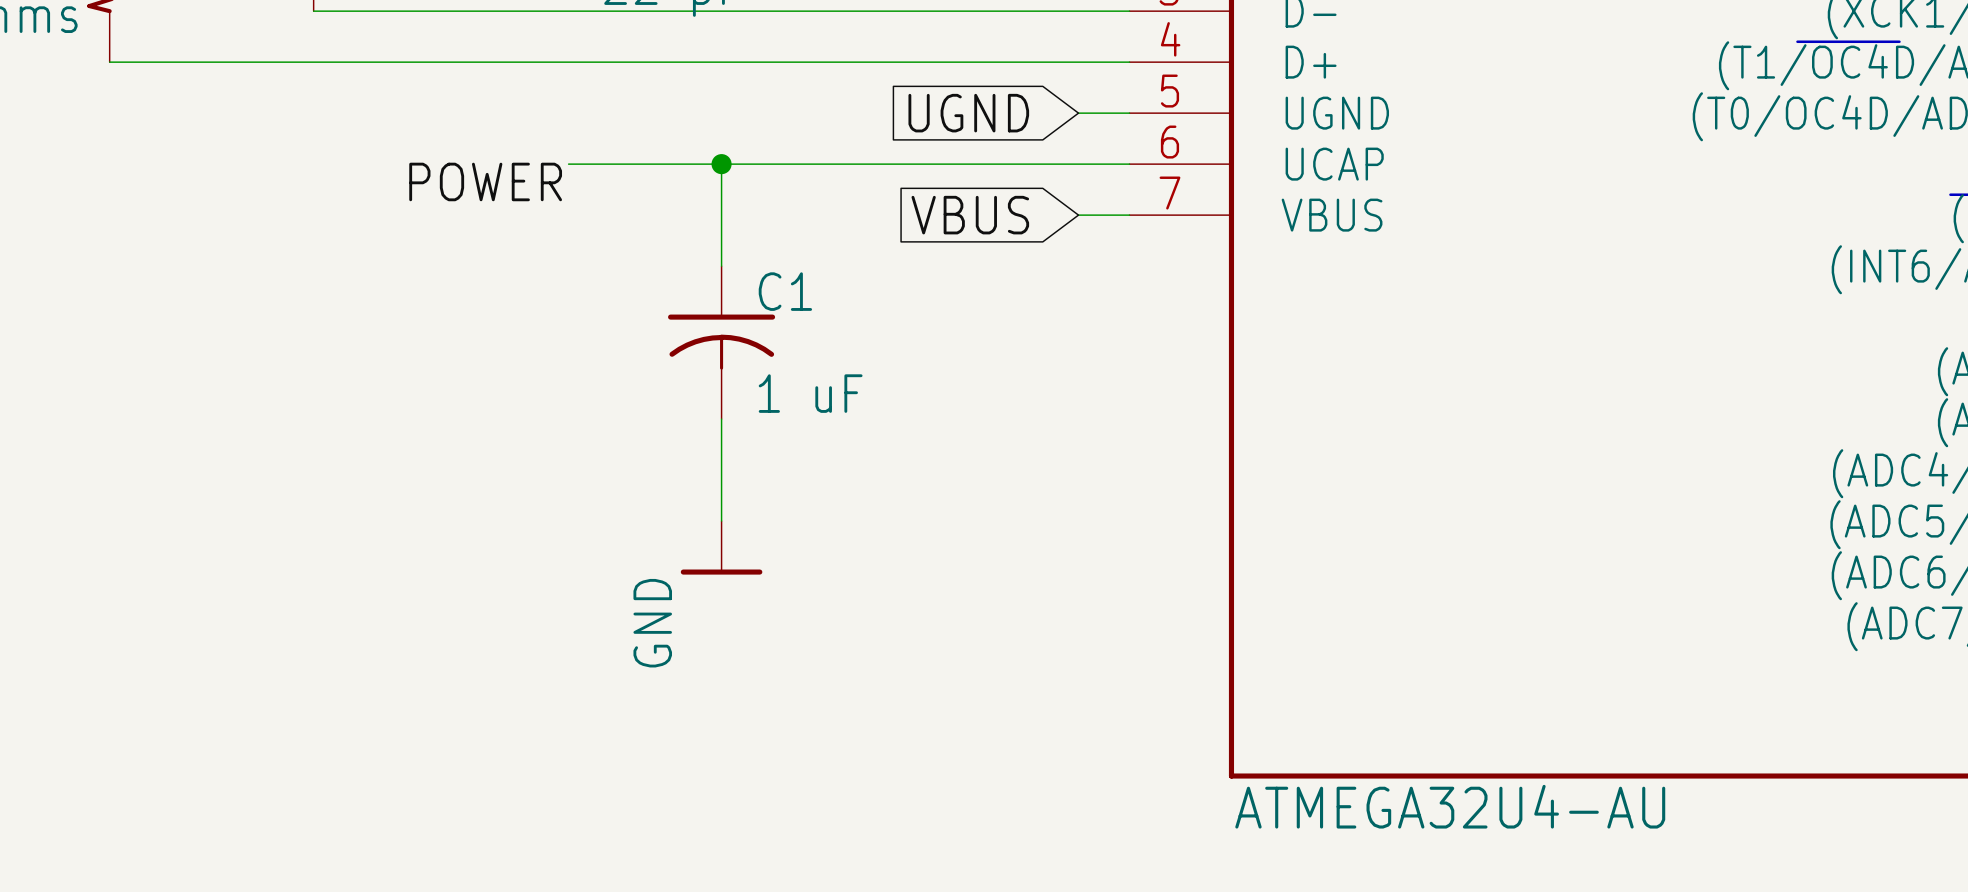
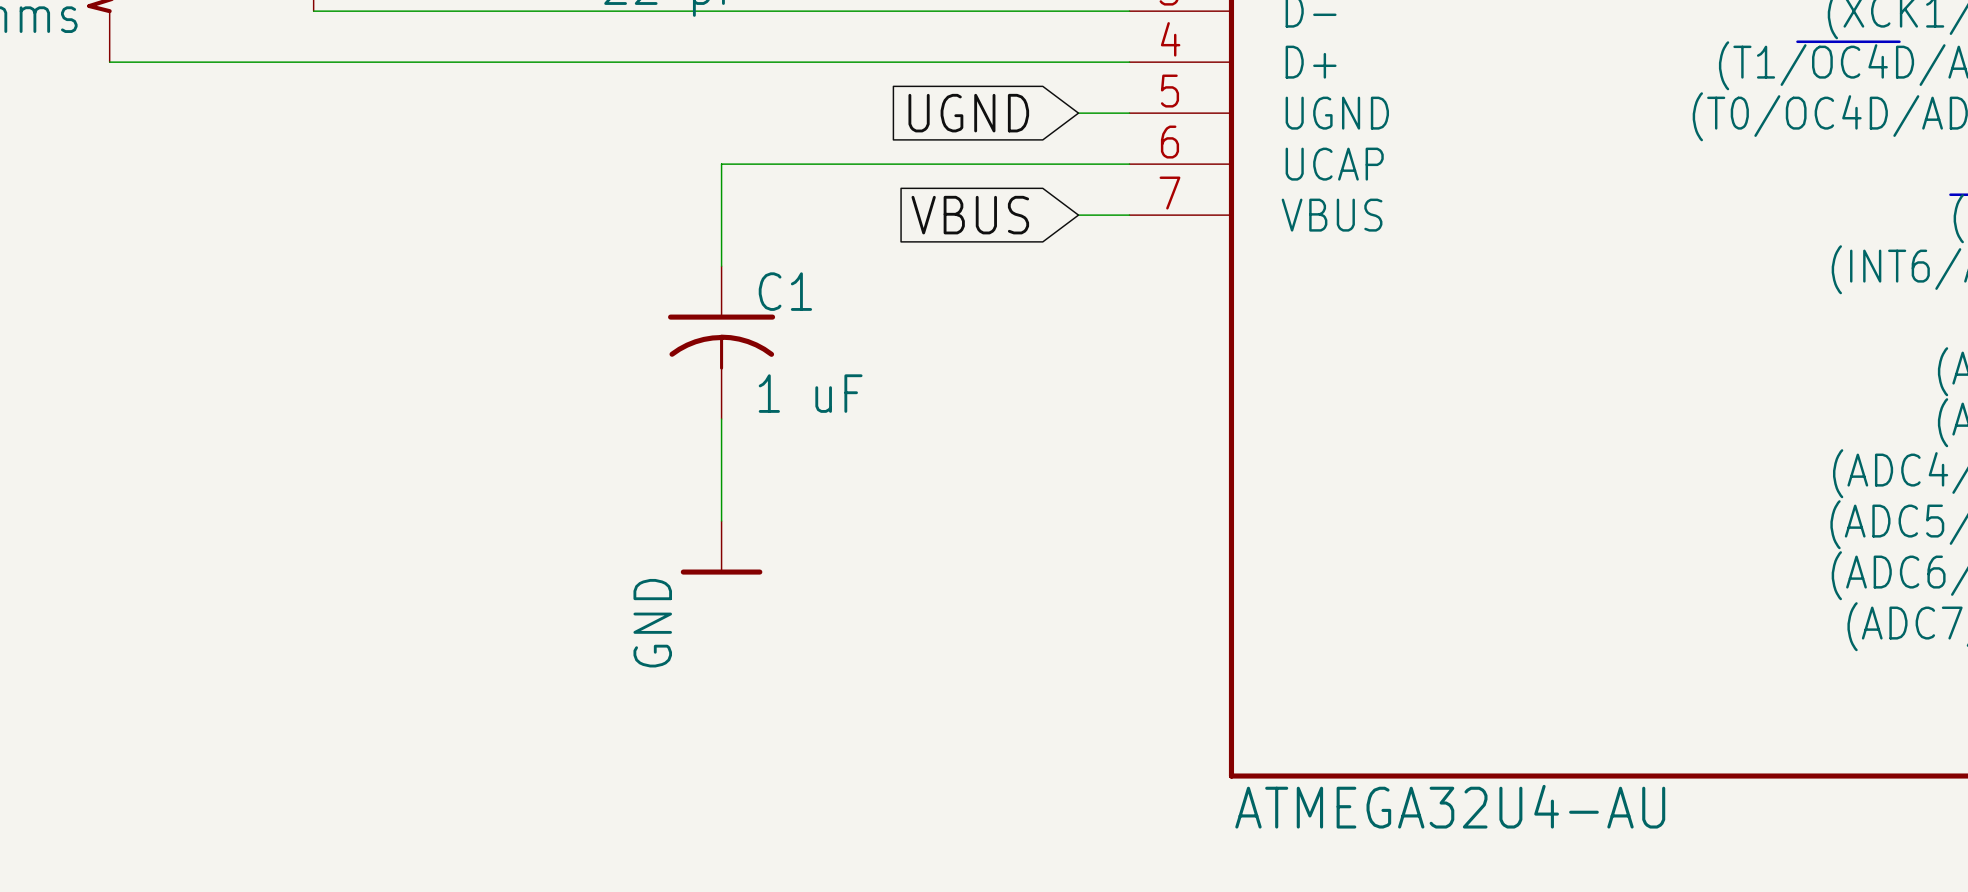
wire: (568, 164) (721, 164) -> none
junction: (721, 164) -> none
label: POWER (485, 181) -> none

